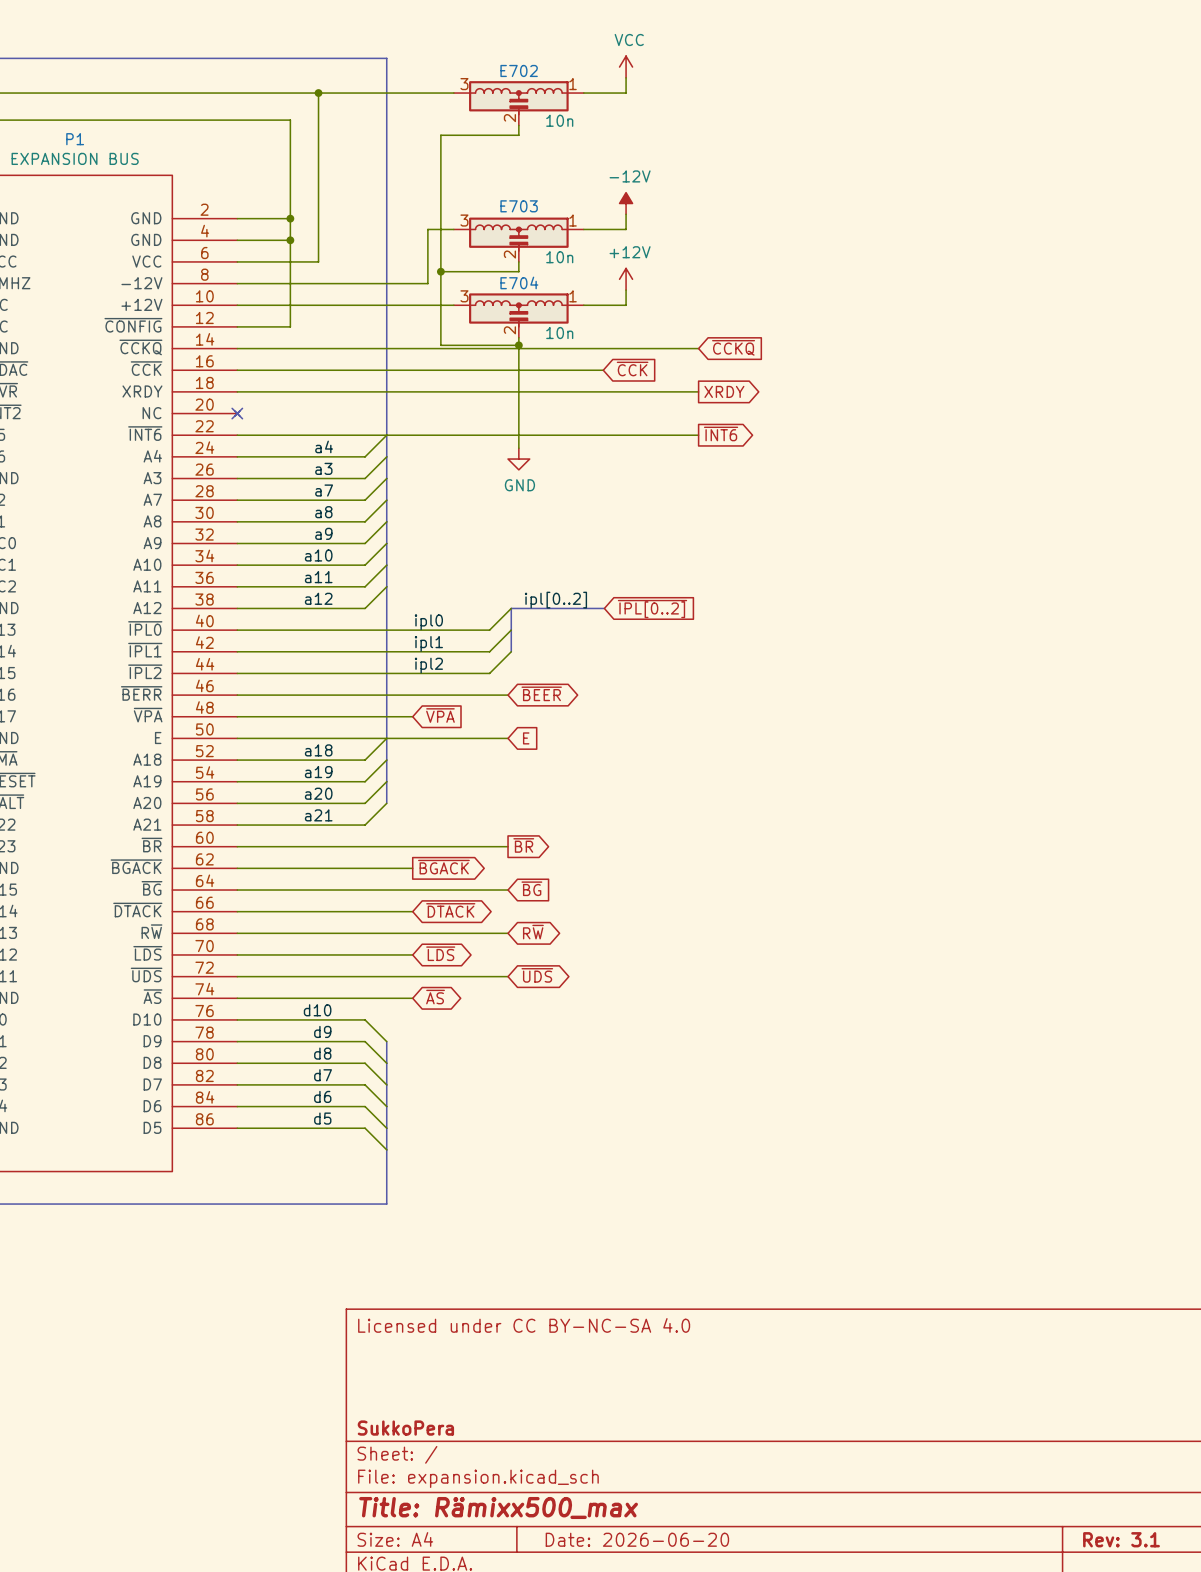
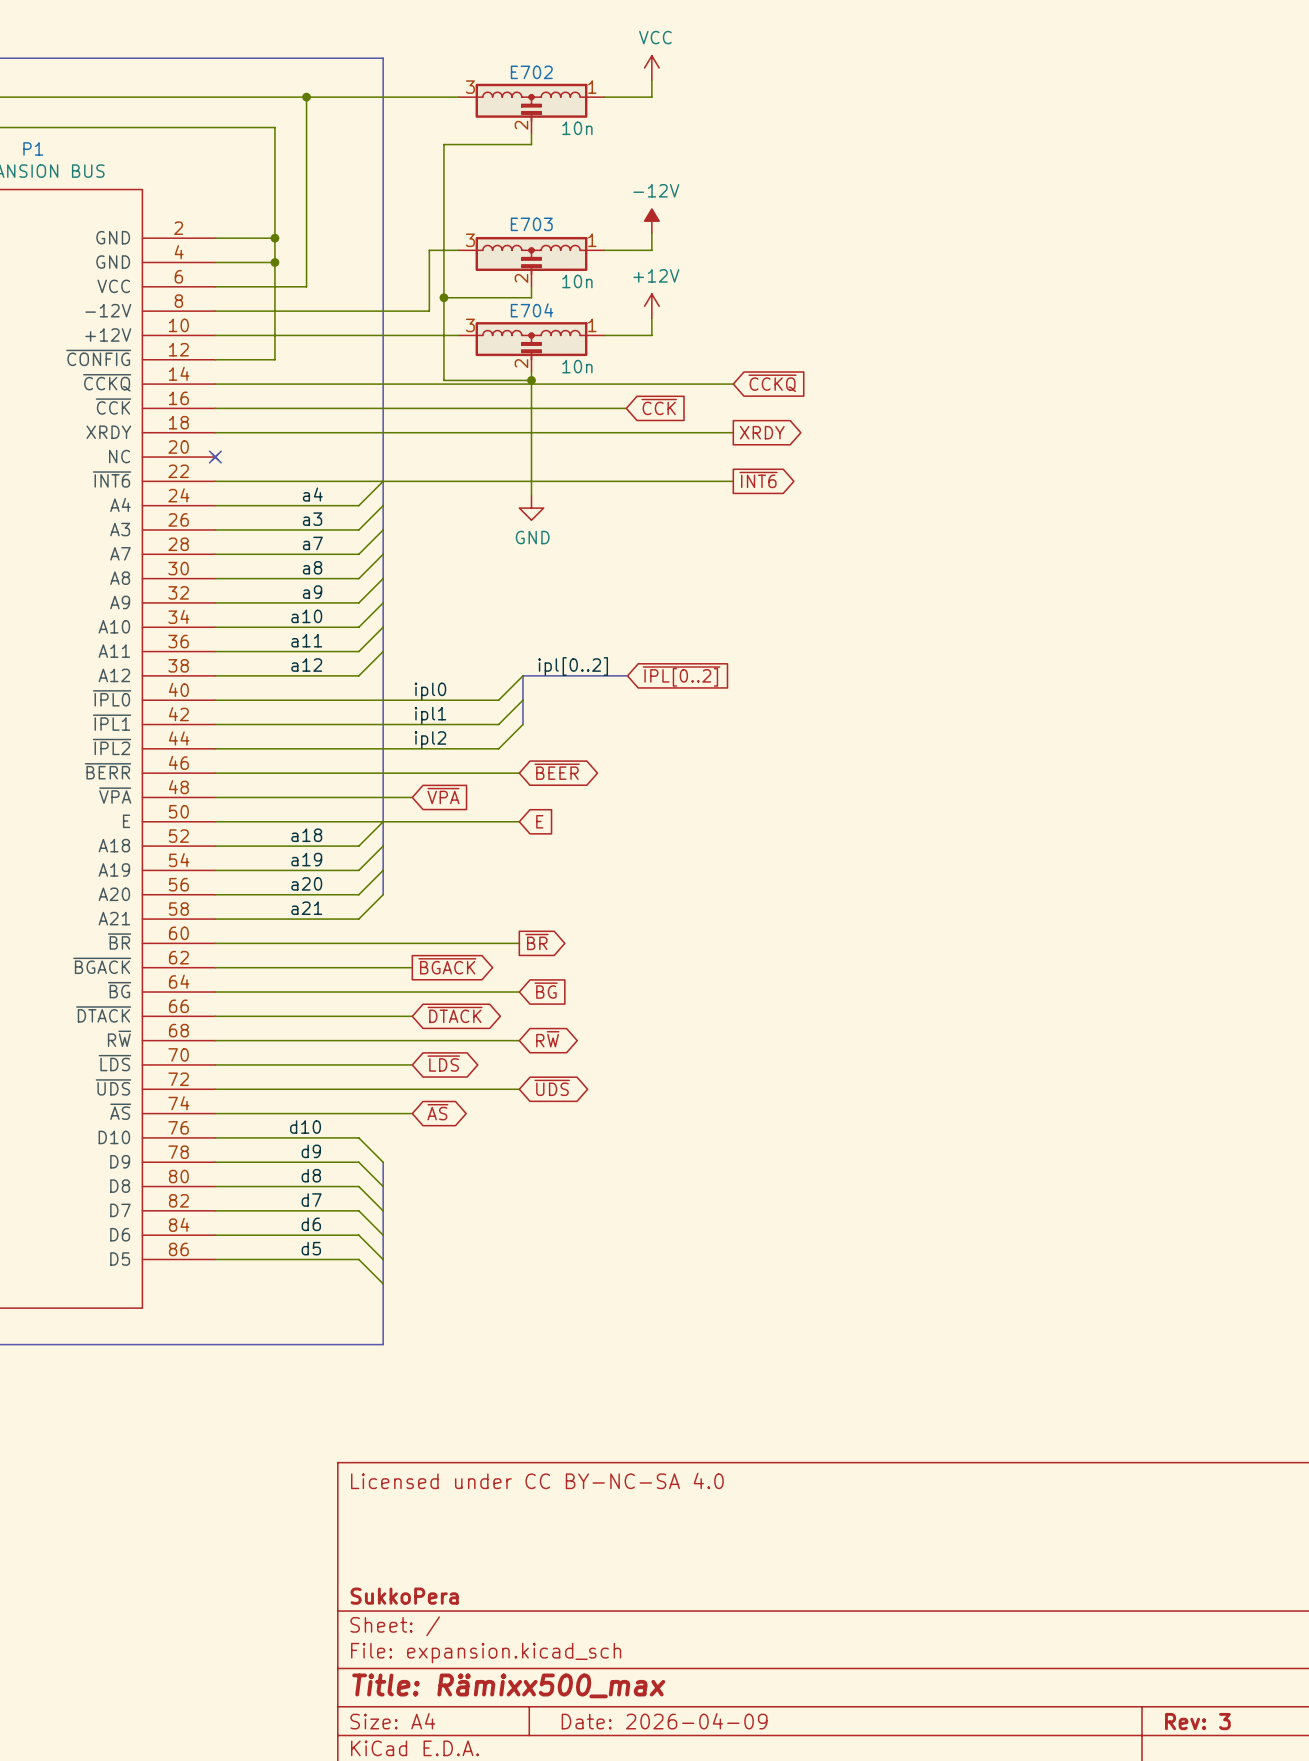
title block: Date: 2026-06-20 (637, 1539) -> Date: 2026-04-09 (664, 1721)
title block: Rev: 3.1 (1121, 1539) -> Rev: 3 (1197, 1721)

